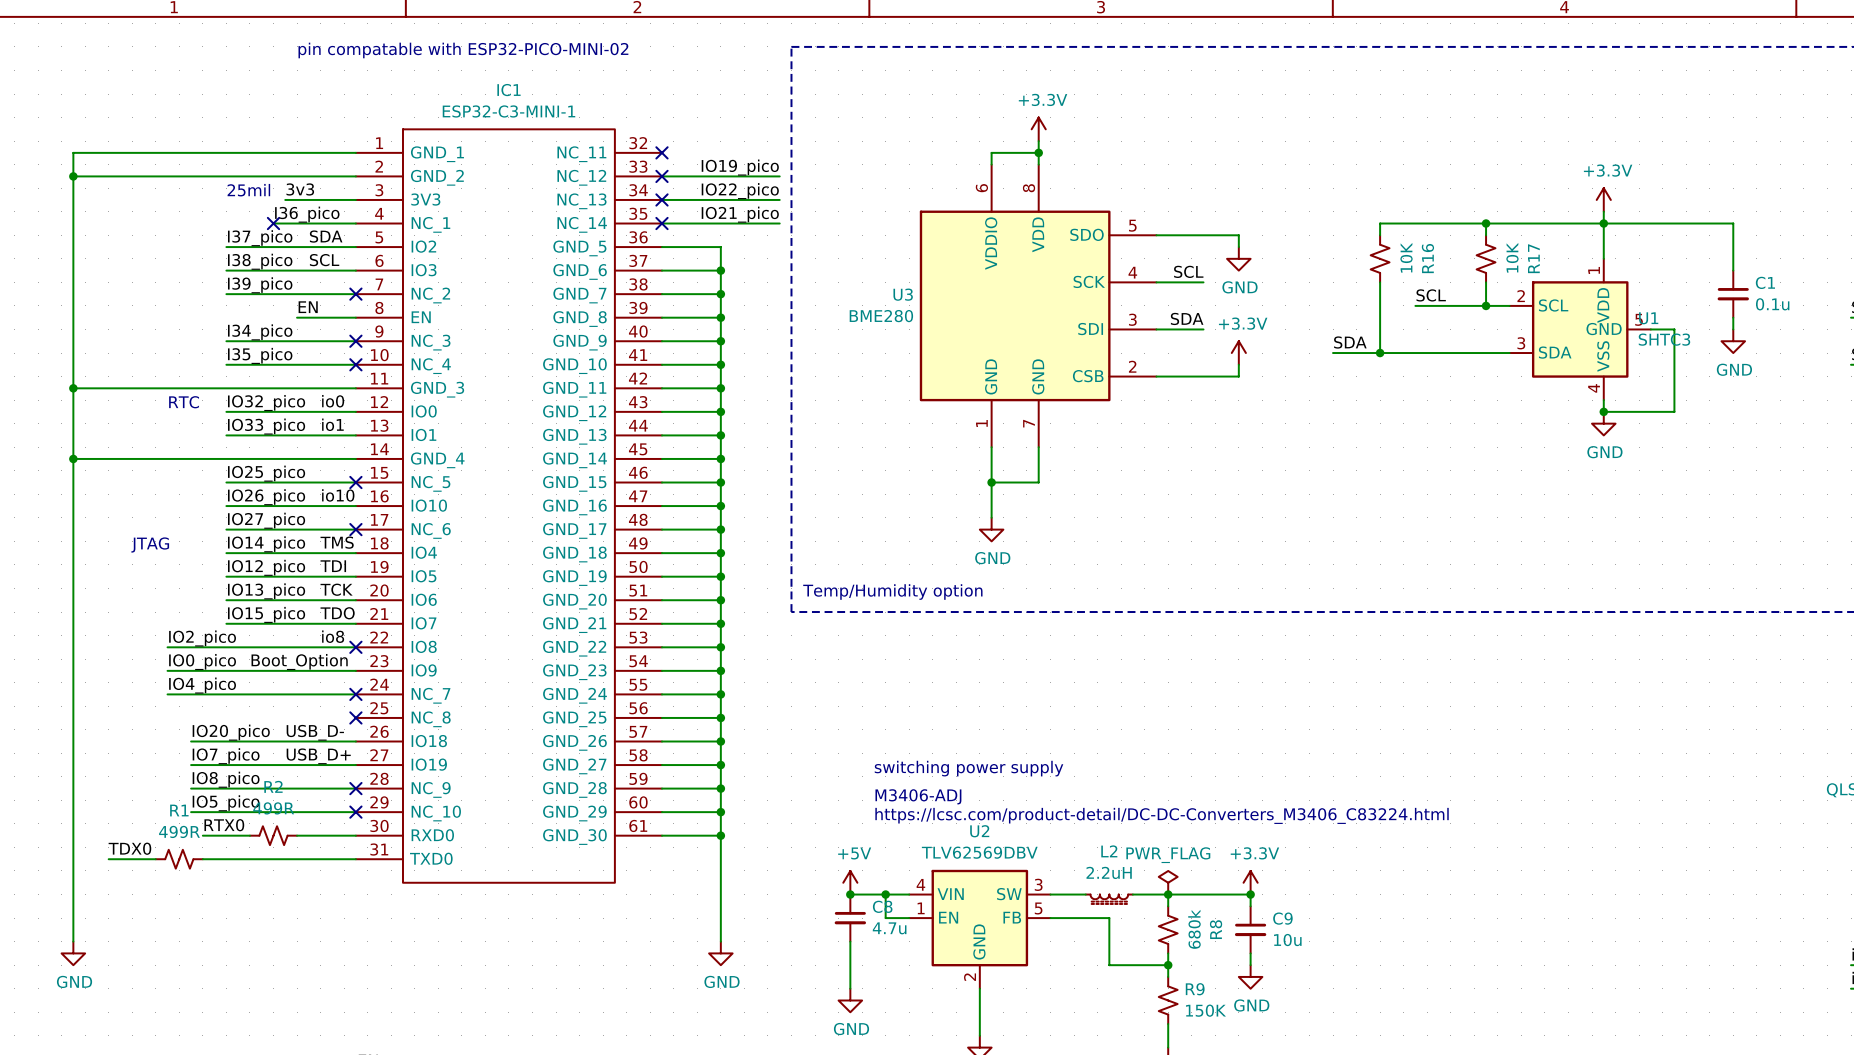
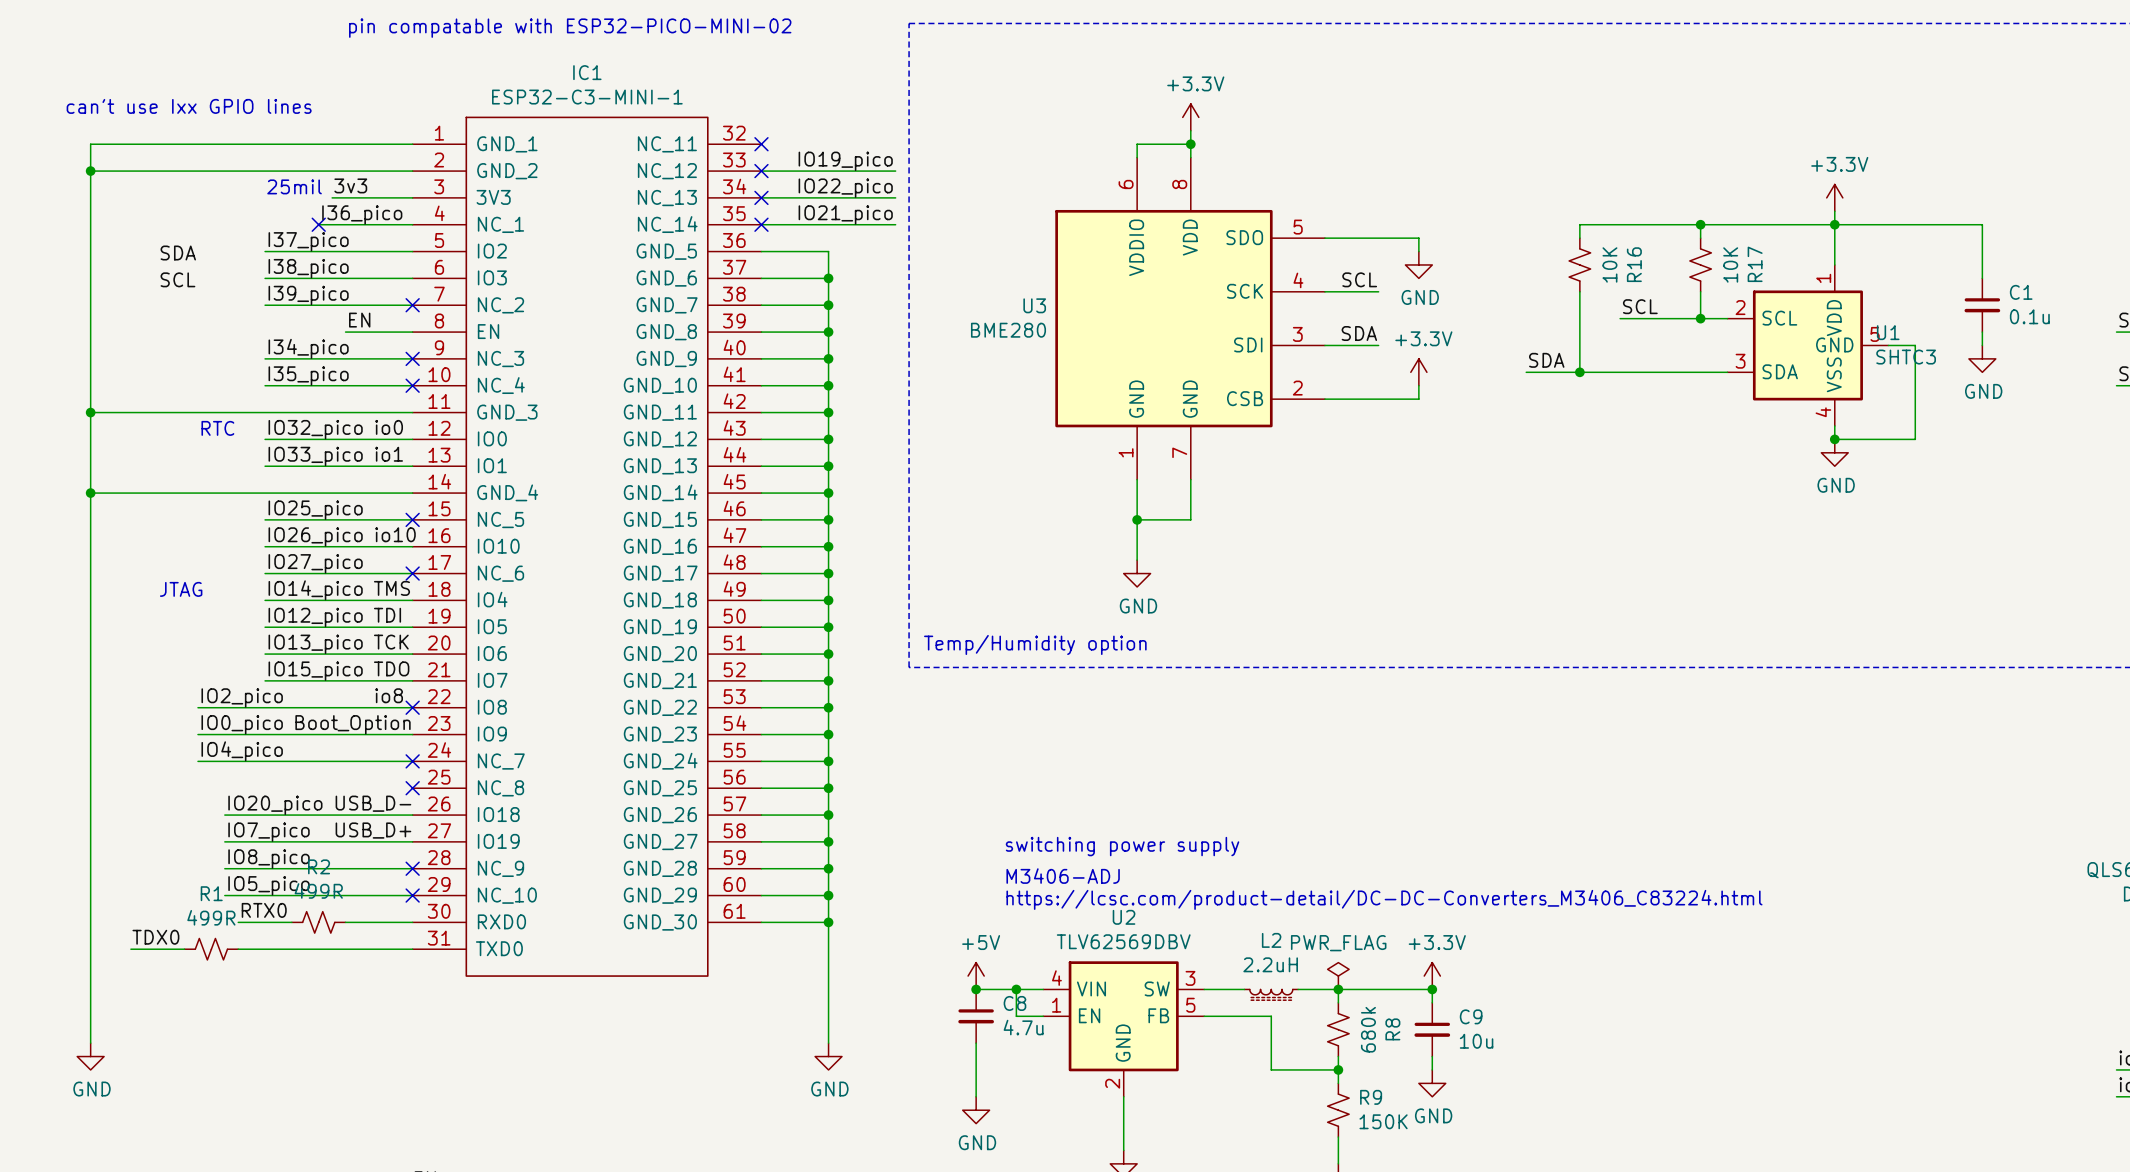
text: none -> can't use Ixx GPIO lines (189, 106)
label position: SDA (326, 236) -> SDA (178, 253)
label position: SCL (324, 260) -> SCL (177, 279)

